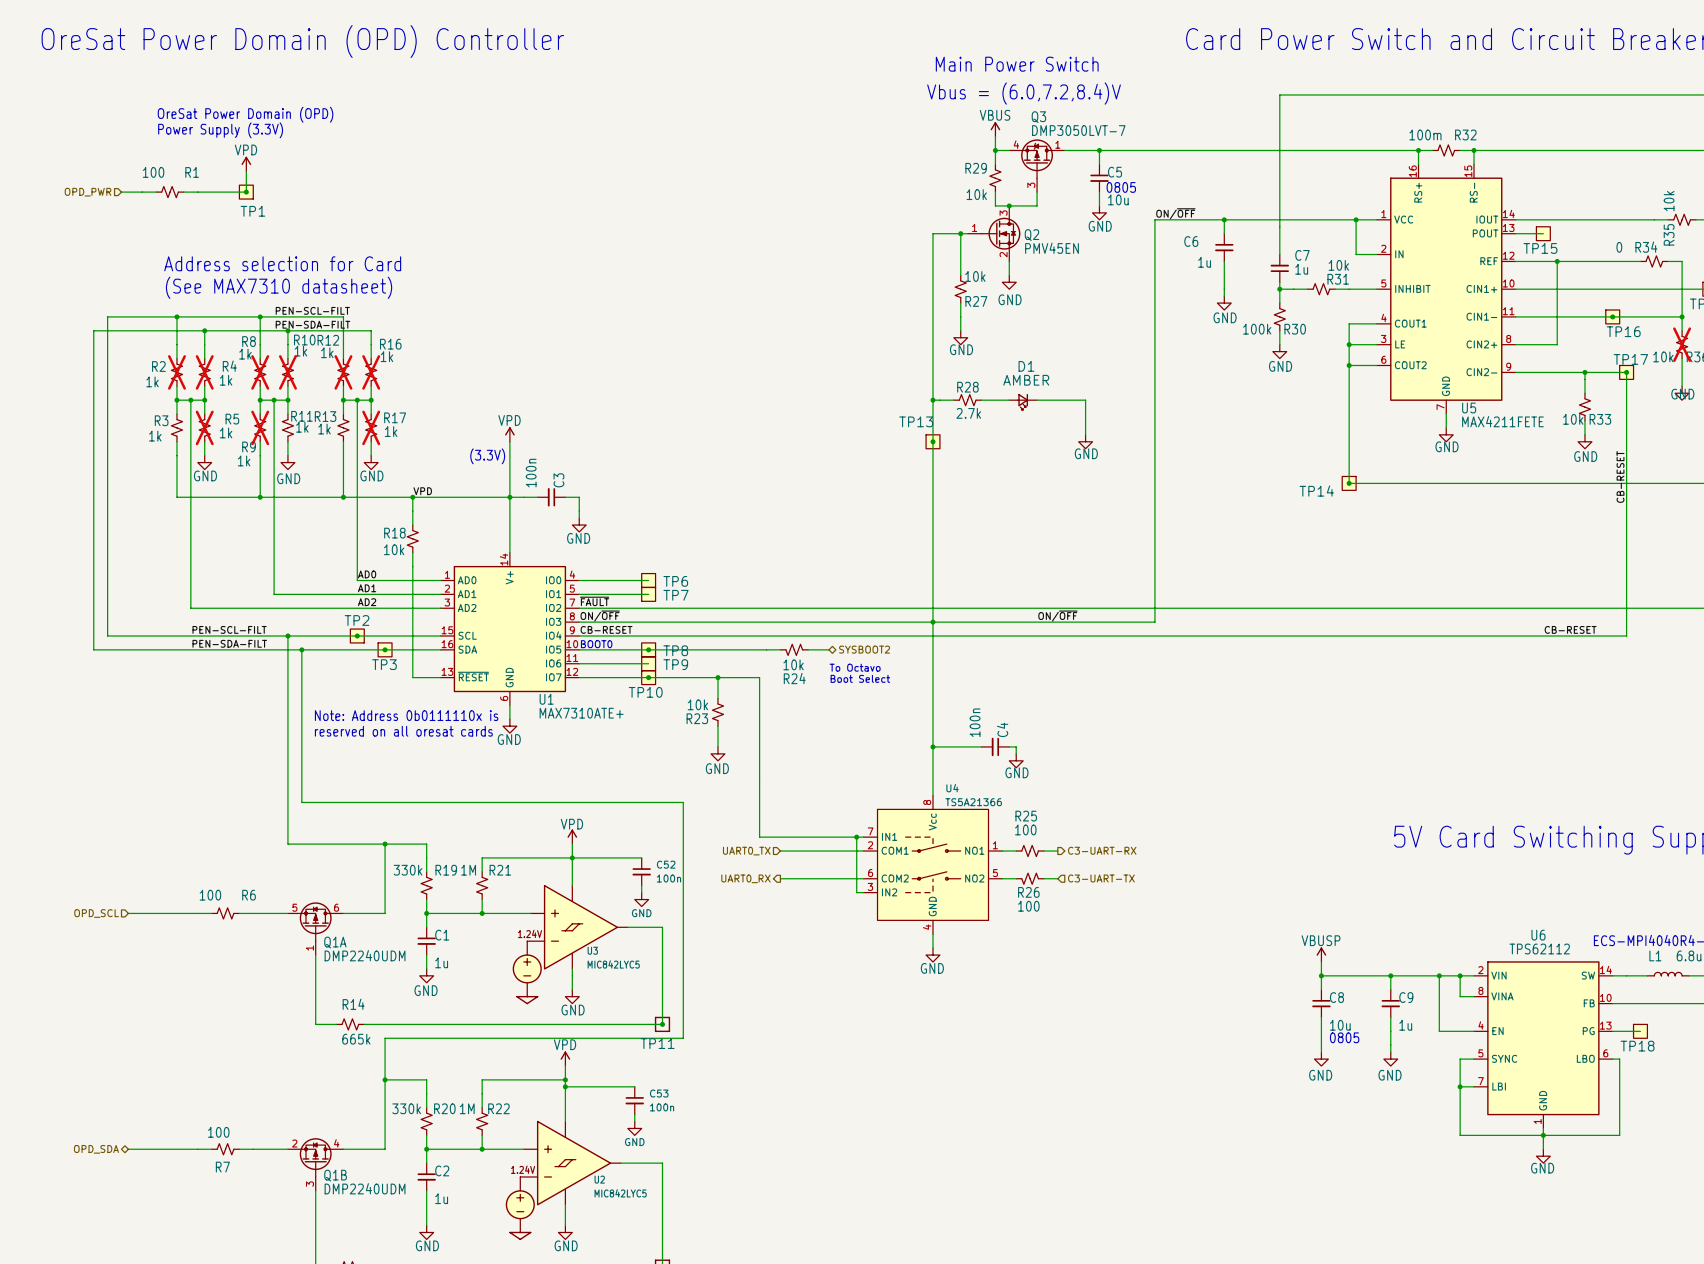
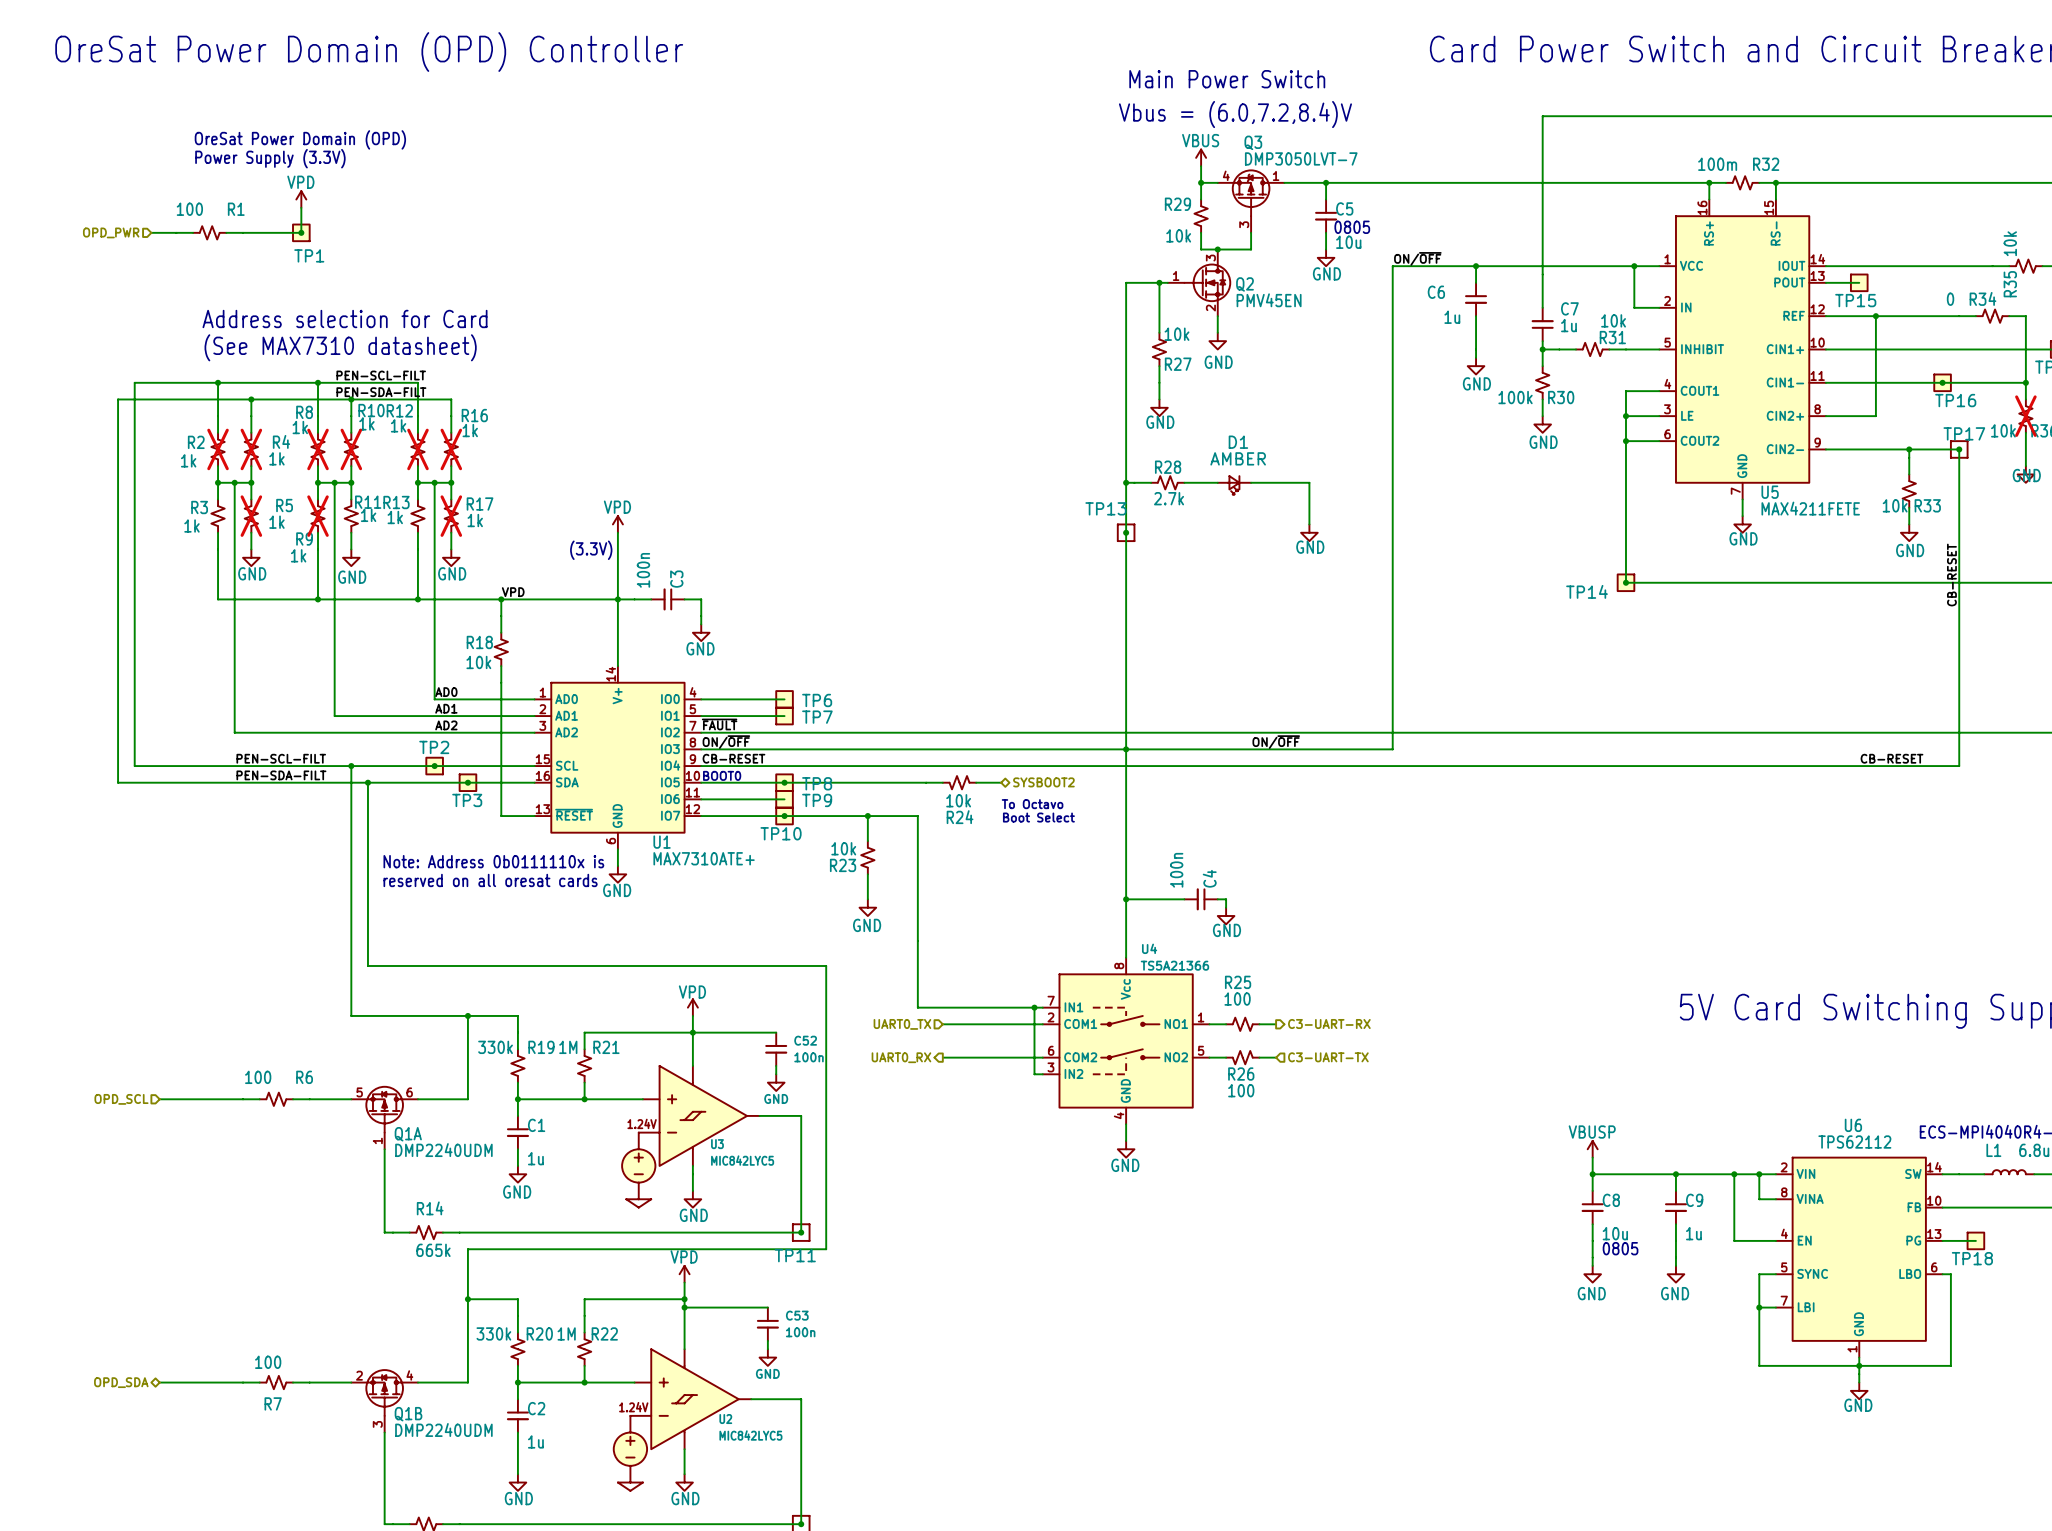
TP17 symbol: [1619, 365, 1634, 380] -> [1950, 440, 1969, 459]
TP13 symbol: [926, 434, 940, 449] -> [1116, 523, 1136, 542]

